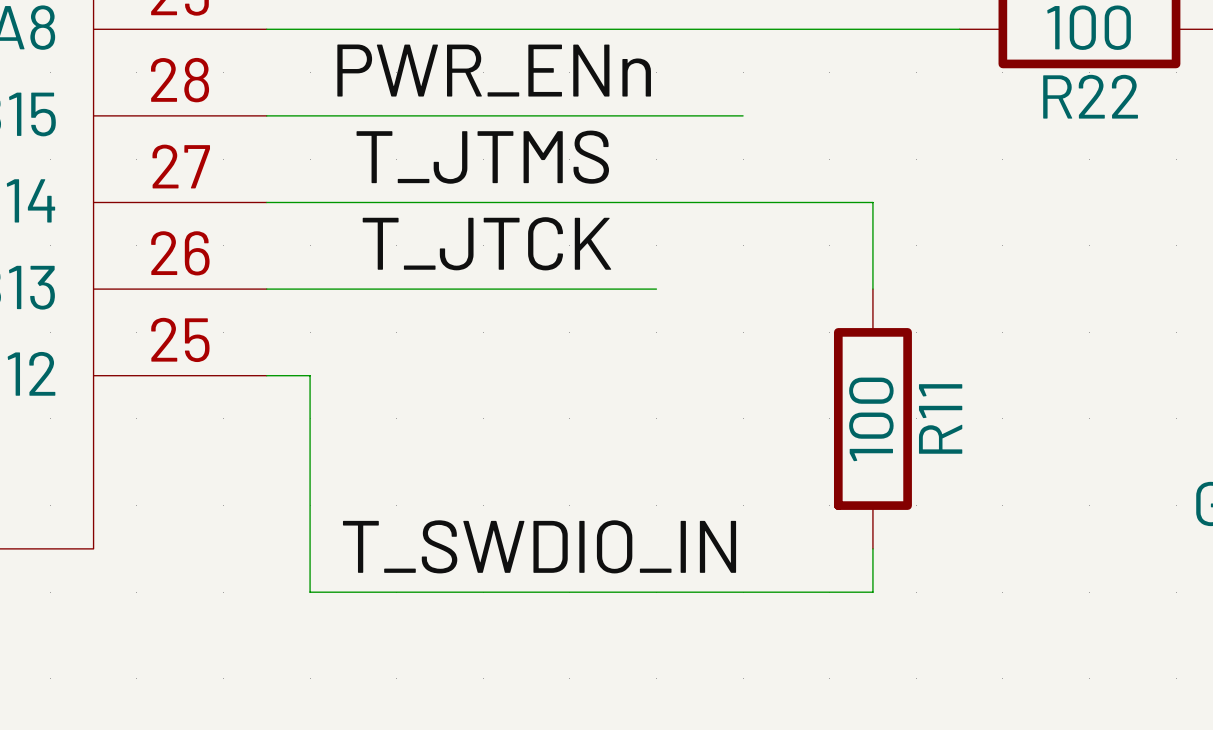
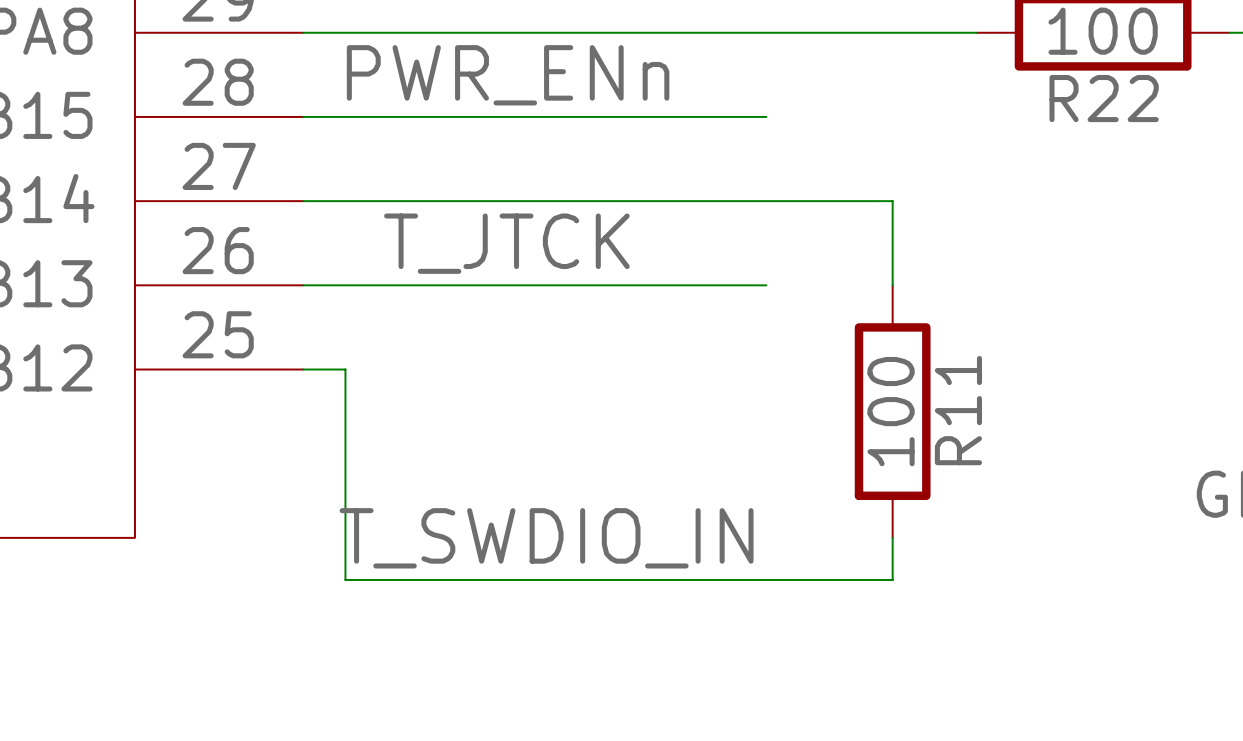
label: T_JTMS (482, 157) -> none
wire: none -> (682, 285) (766, 285)

